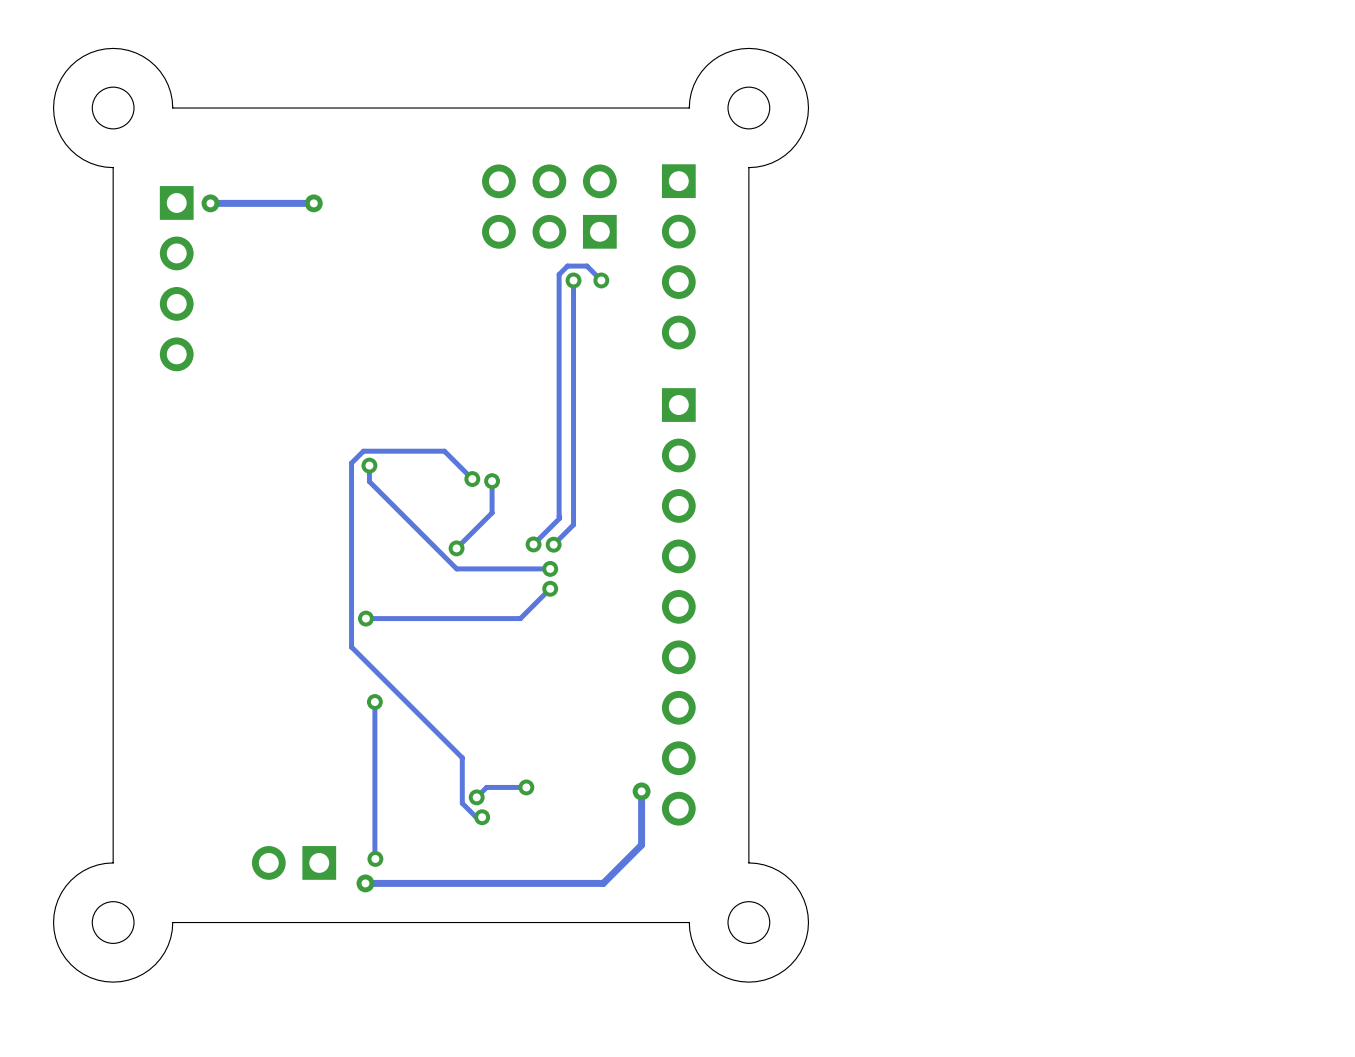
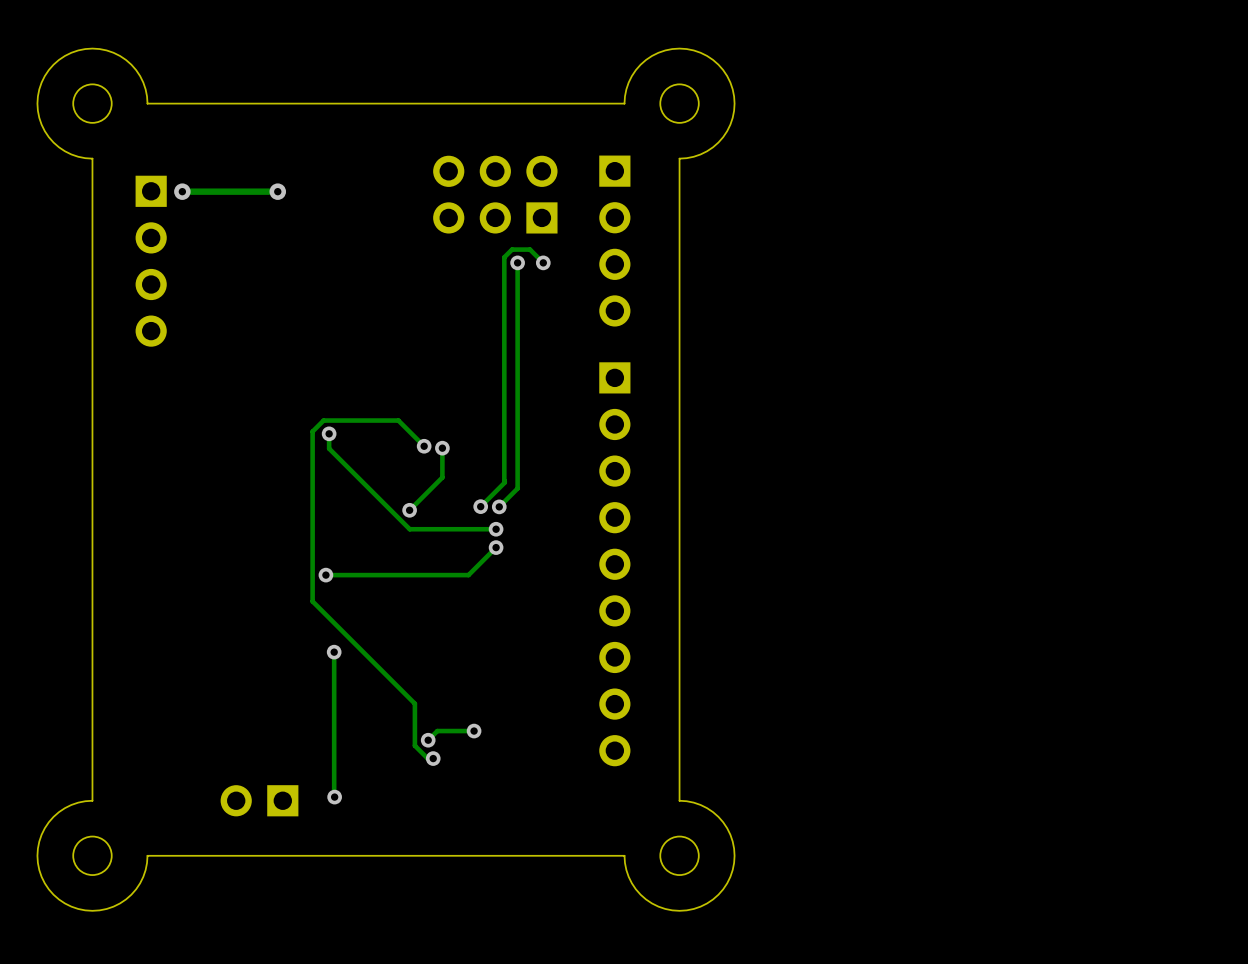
track: (641, 791) (641, 845) (603, 883) (365, 883) -> none
via: (641, 791) -> none
via: (365, 883) -> none

